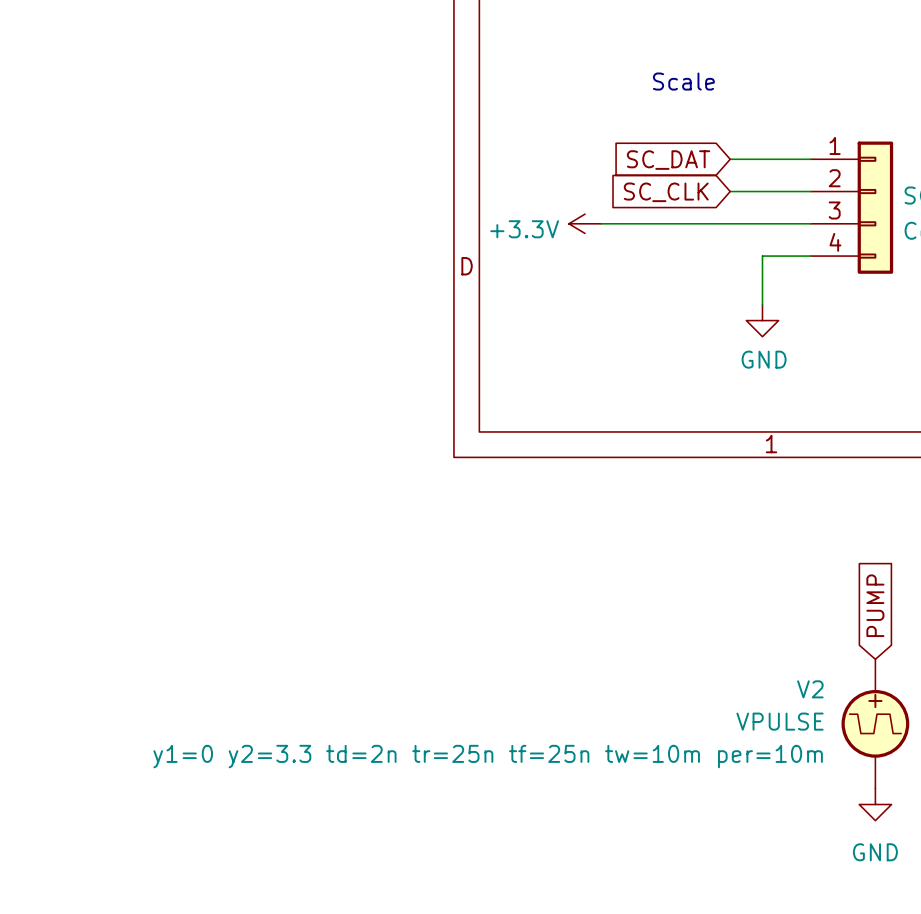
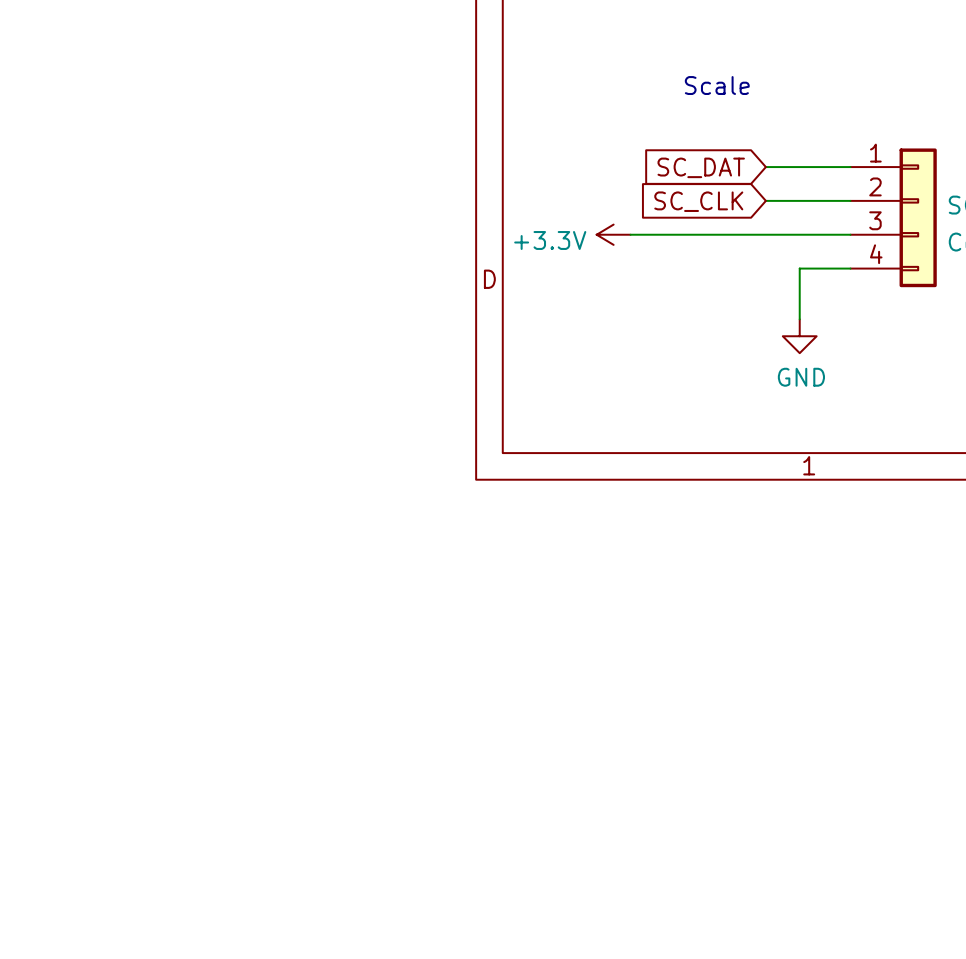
global label: PUMP (875, 605) -> none
V2: VPULSE (875, 723) -> none
power symbol: GND (875, 804) -> none

